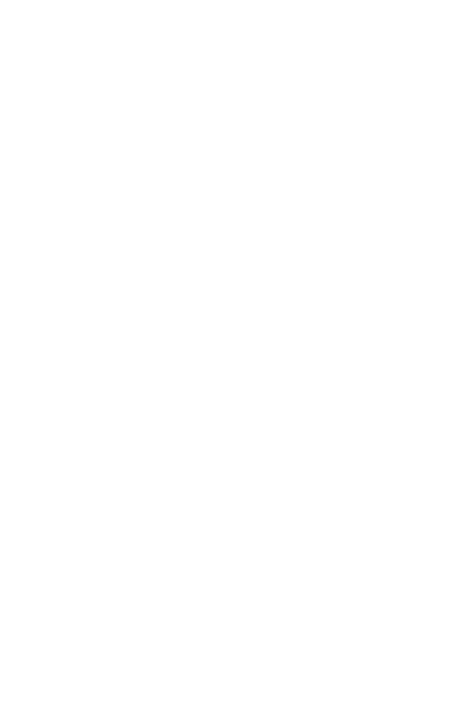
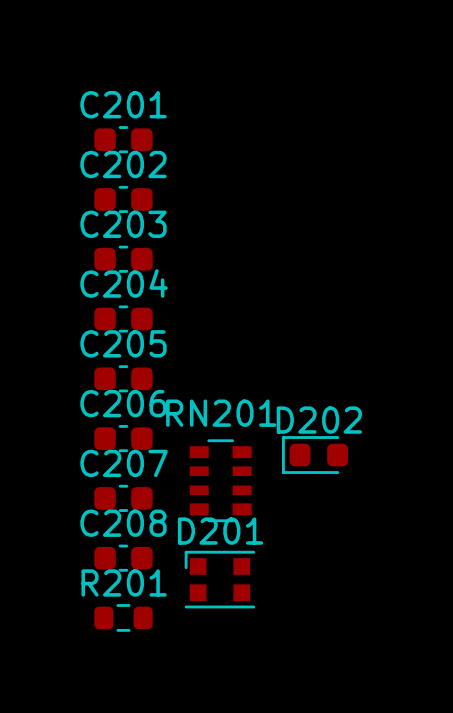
C201: none -> (123, 139)
C202: none -> (123, 199)
C203: none -> (123, 259)
C204: none -> (123, 319)
C205: none -> (123, 378)
C206: none -> (123, 438)
D202: none -> (314, 455)
RN201: none -> (220, 480)
C207: none -> (123, 498)
C208: none -> (123, 558)
D201: none -> (219, 579)
R201: none -> (123, 617)

